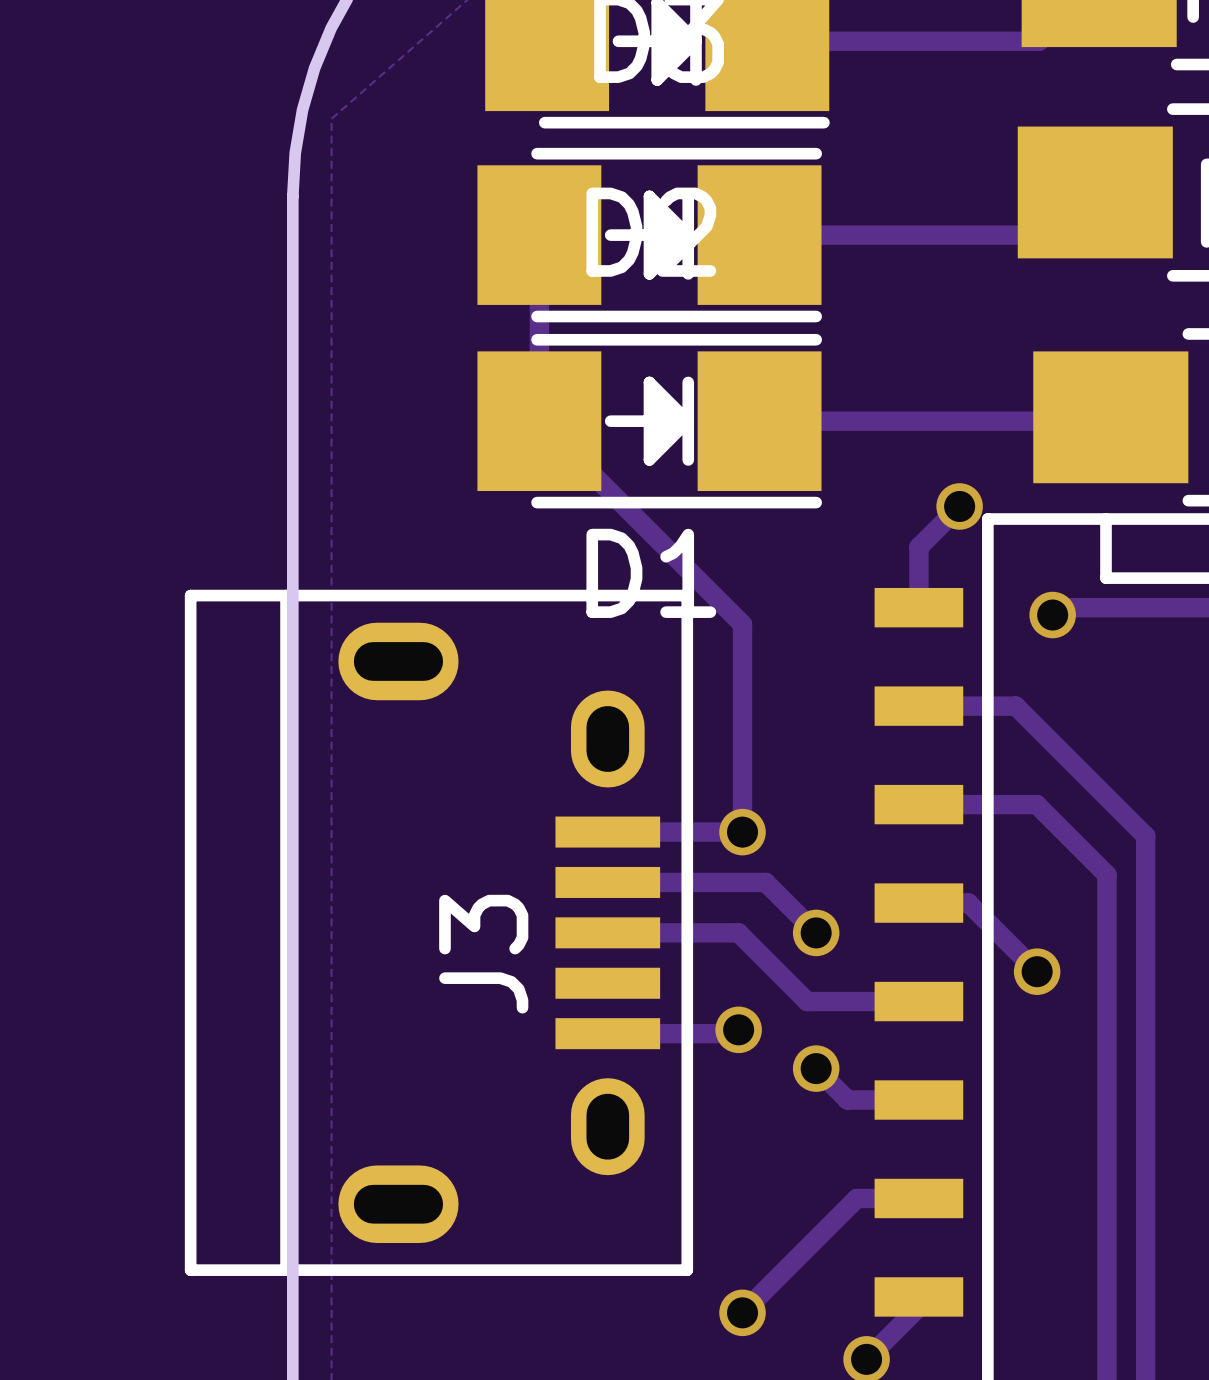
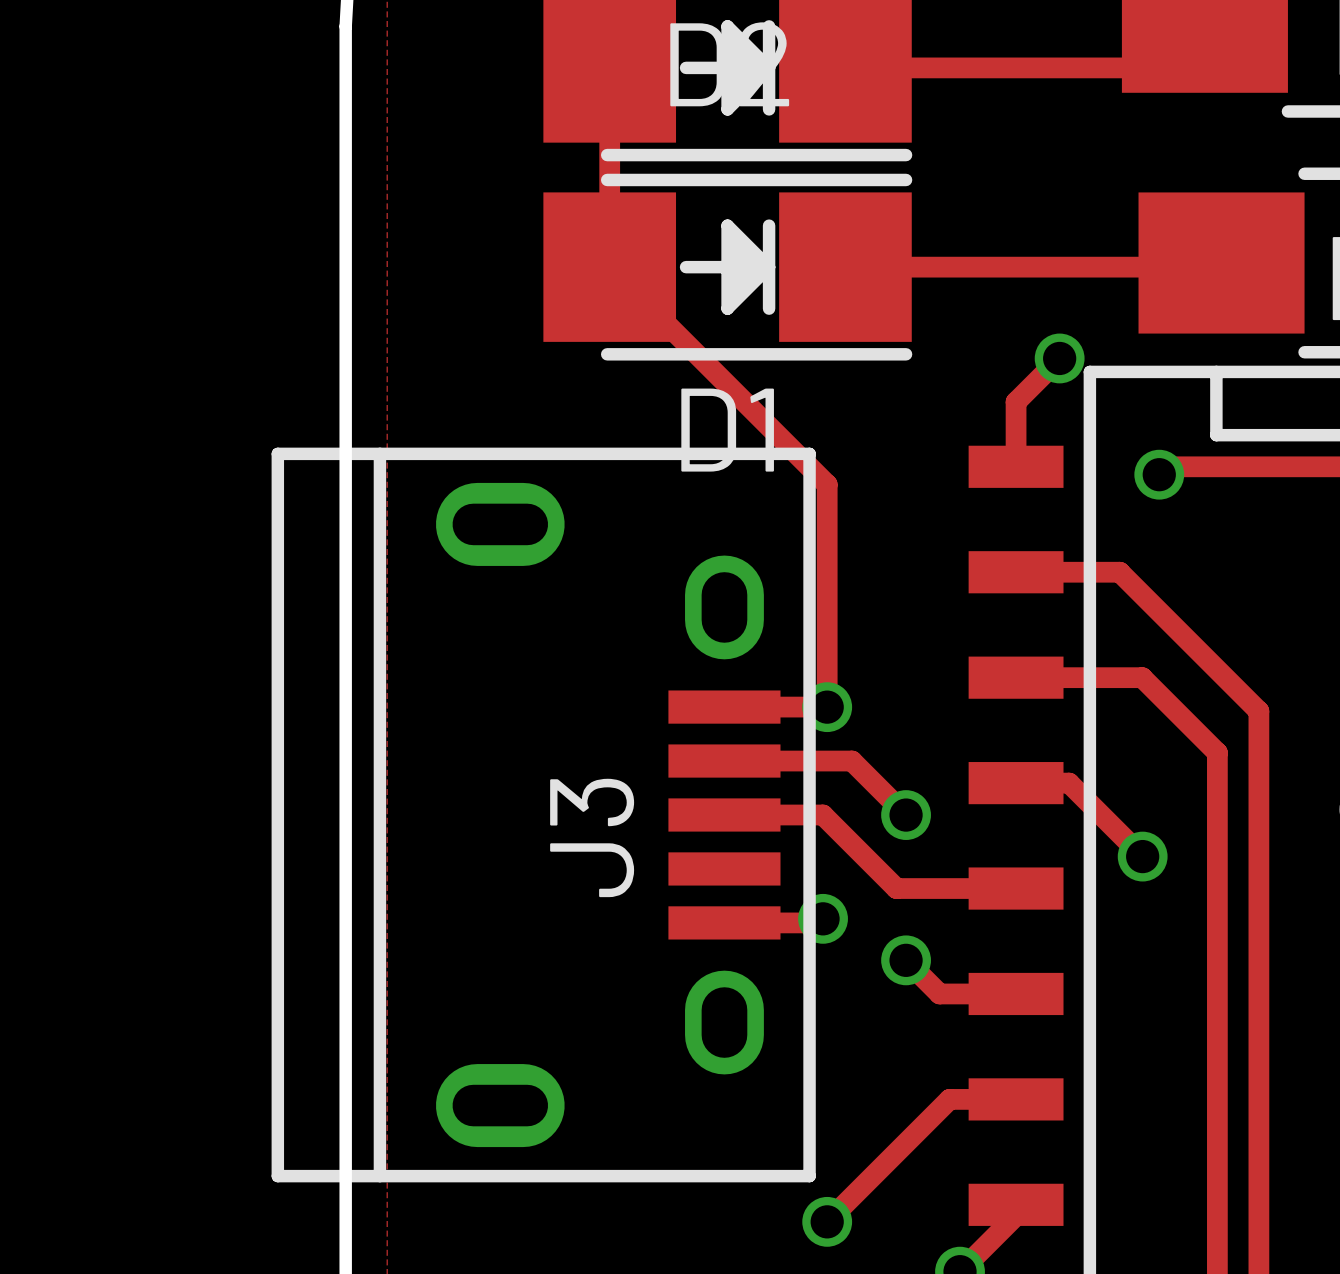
J3 position: (438, 932) -> (543, 814)

